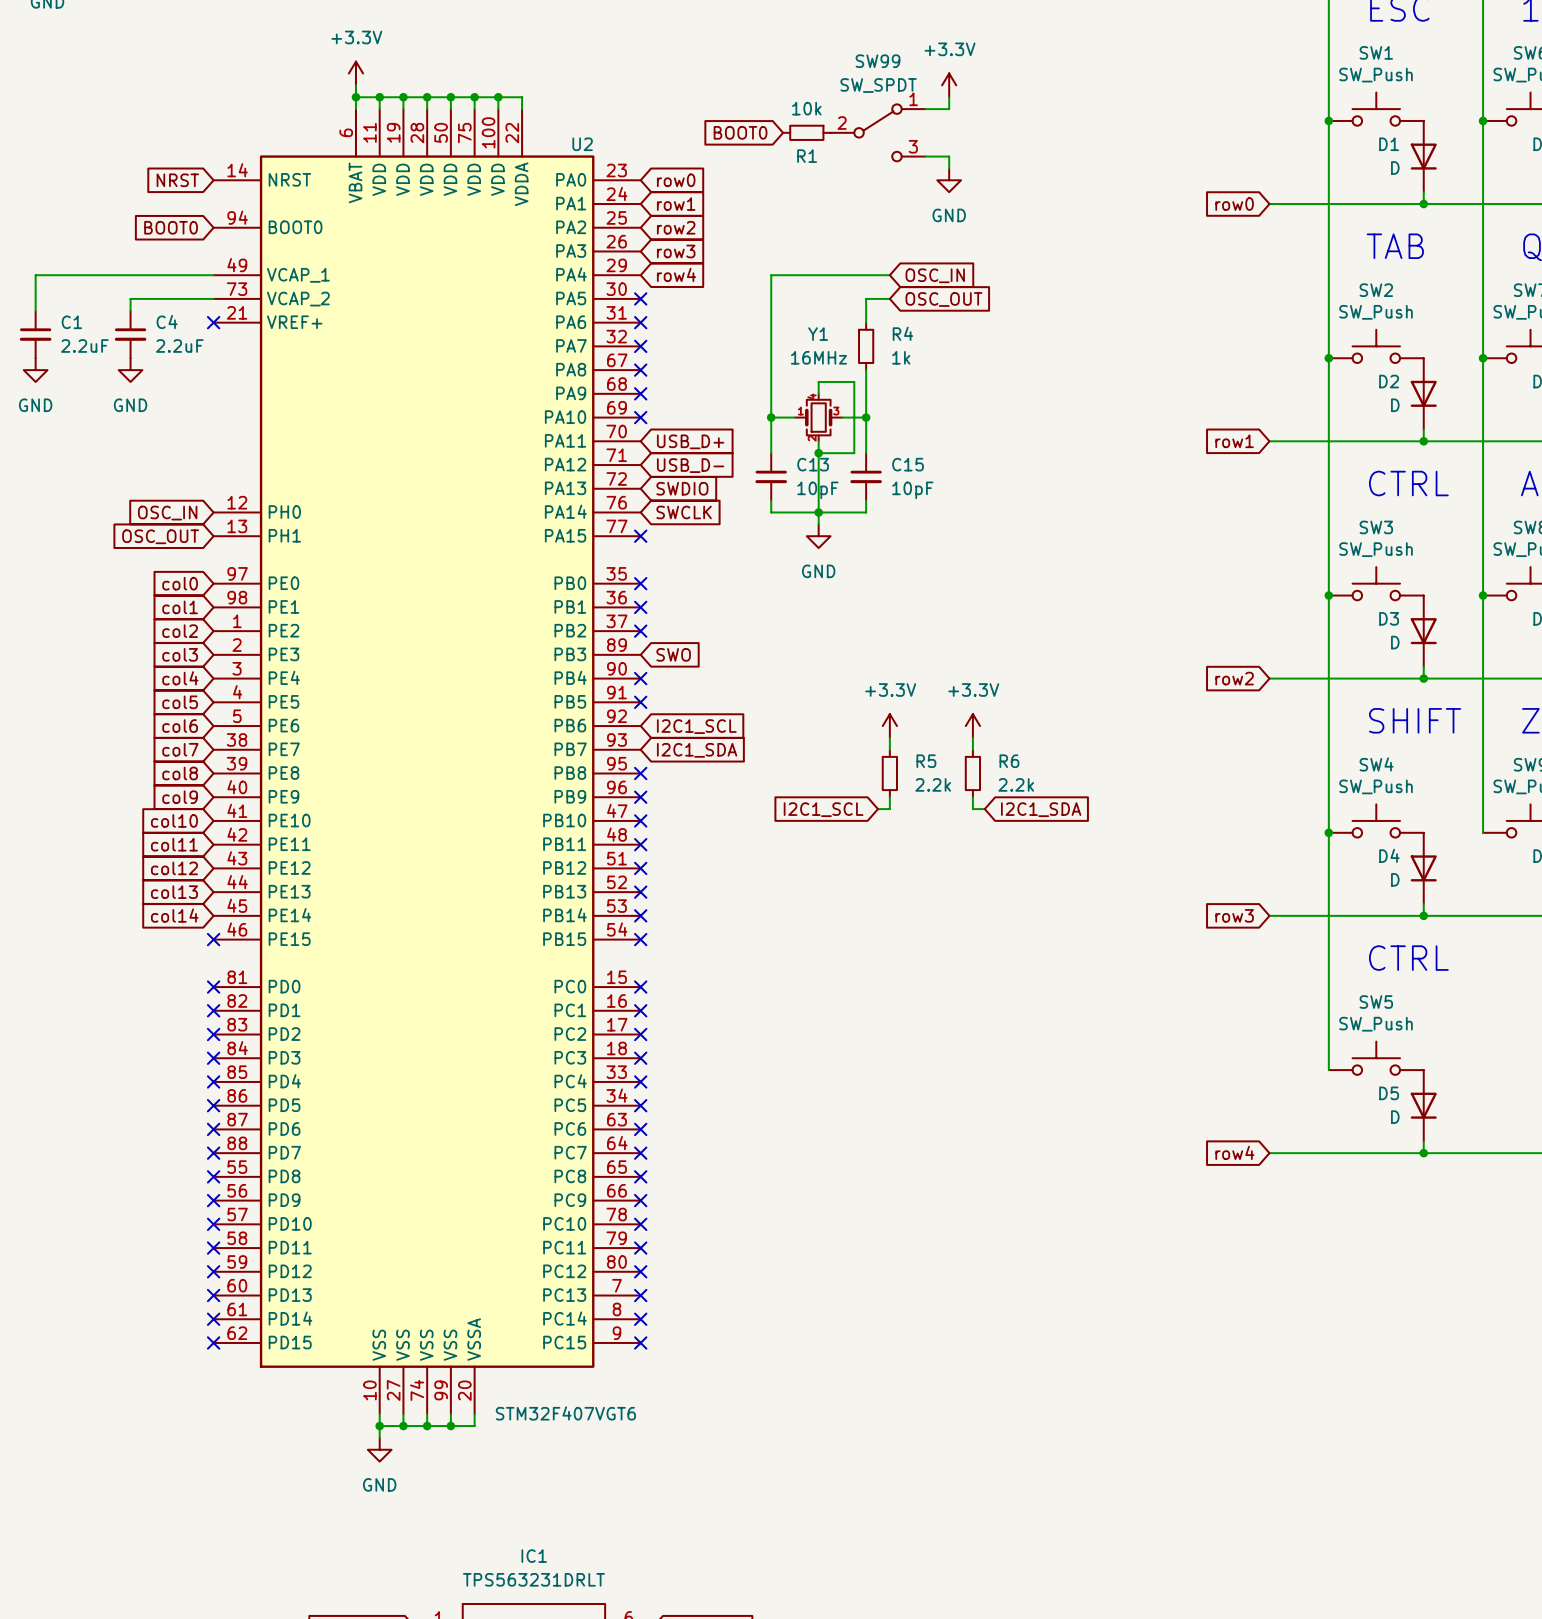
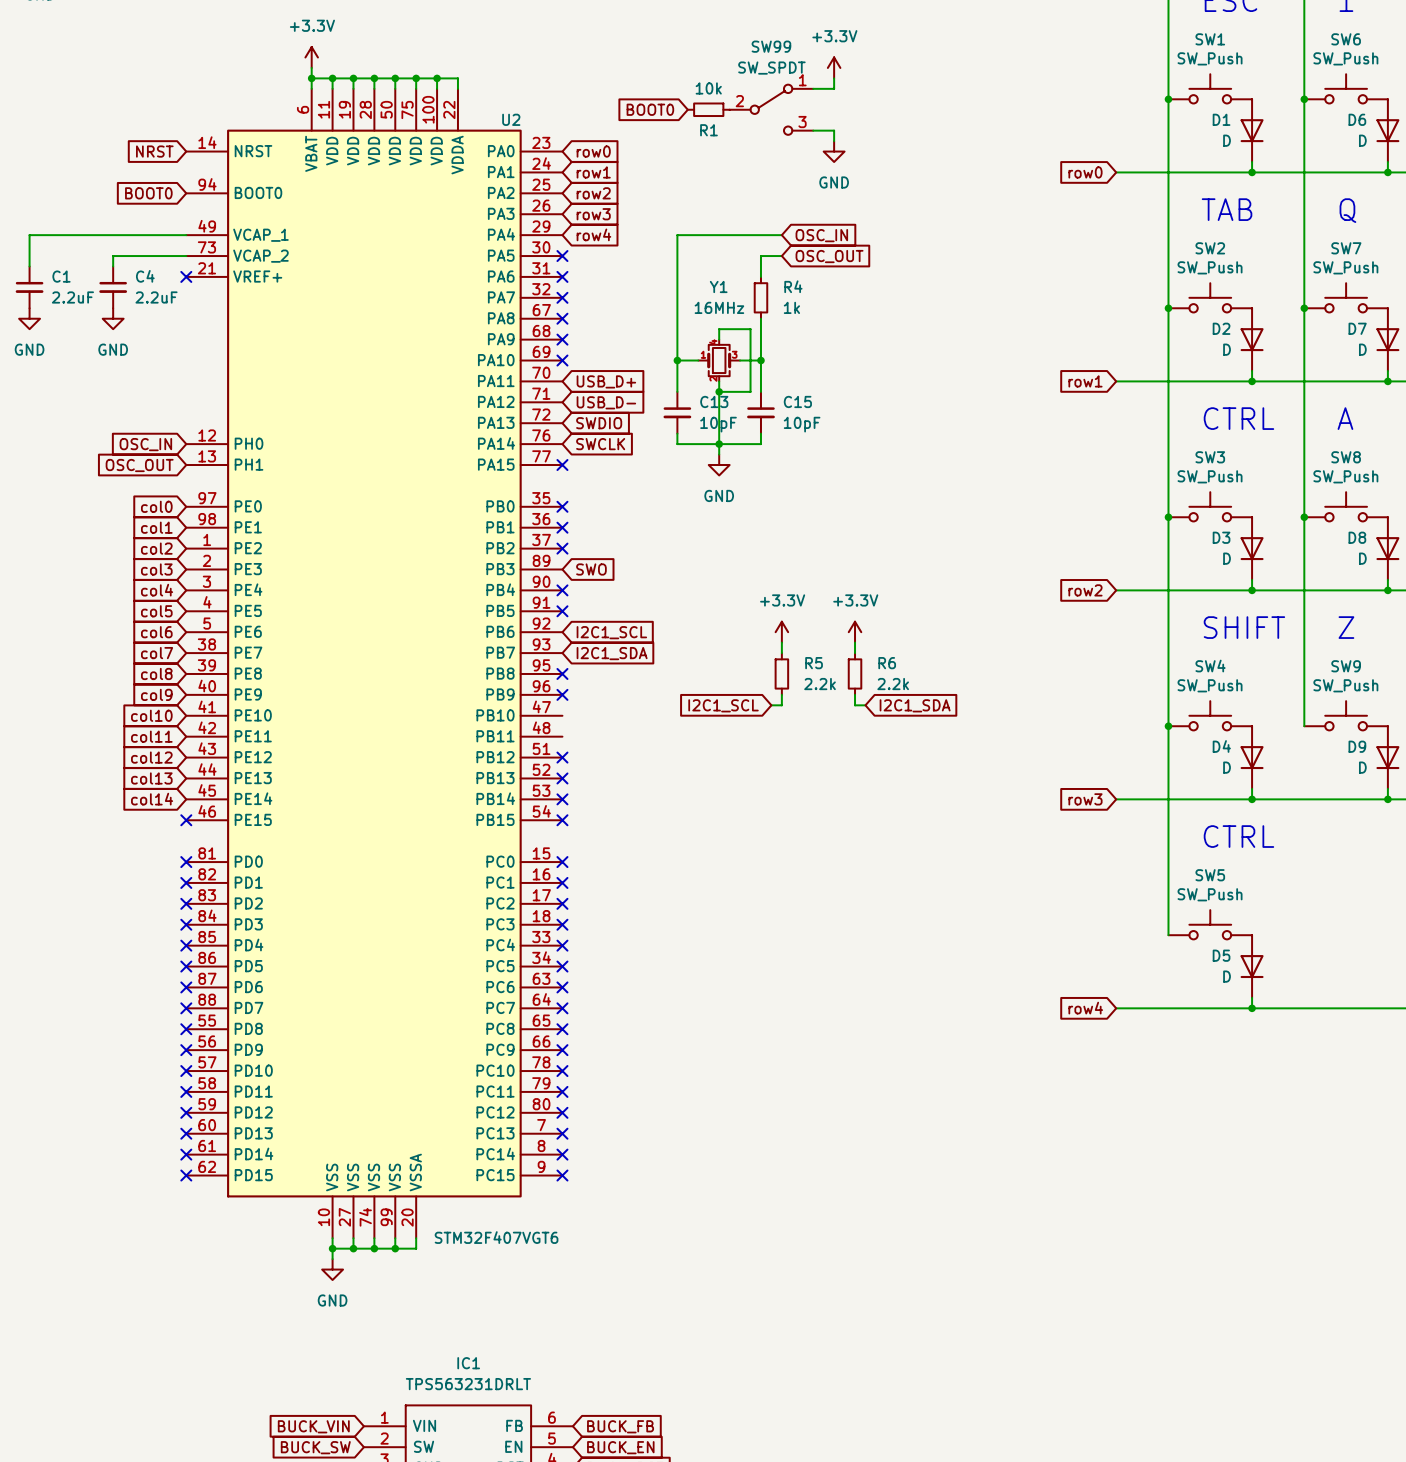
no-connect mark: (640, 820) -> none
no-connect mark: (640, 844) -> none

